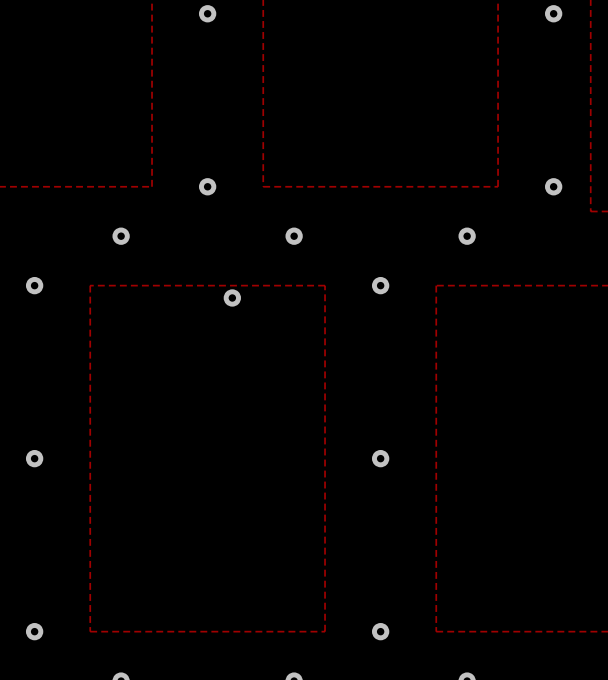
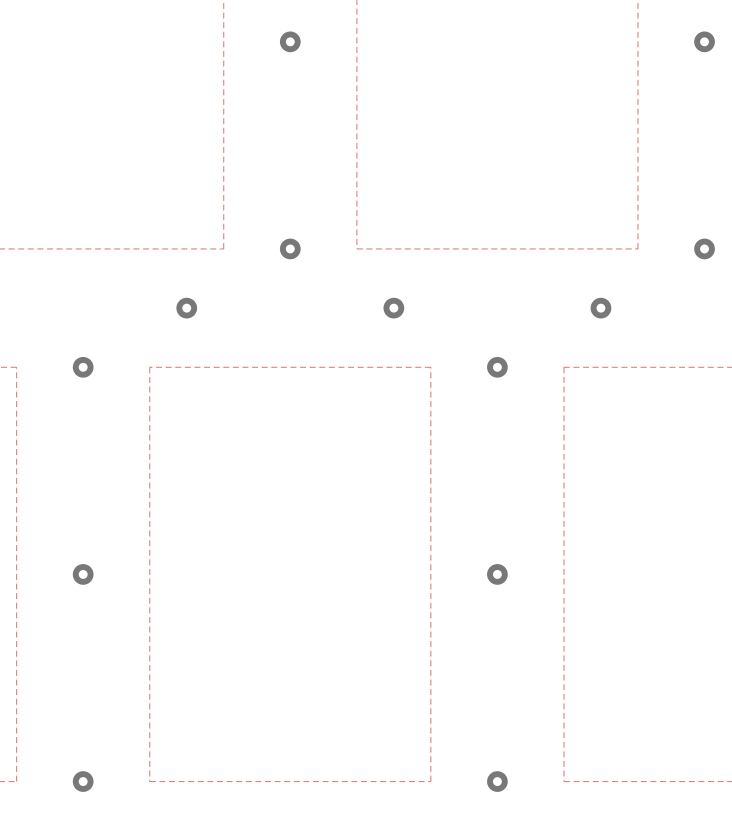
via: (232, 297) -> none

